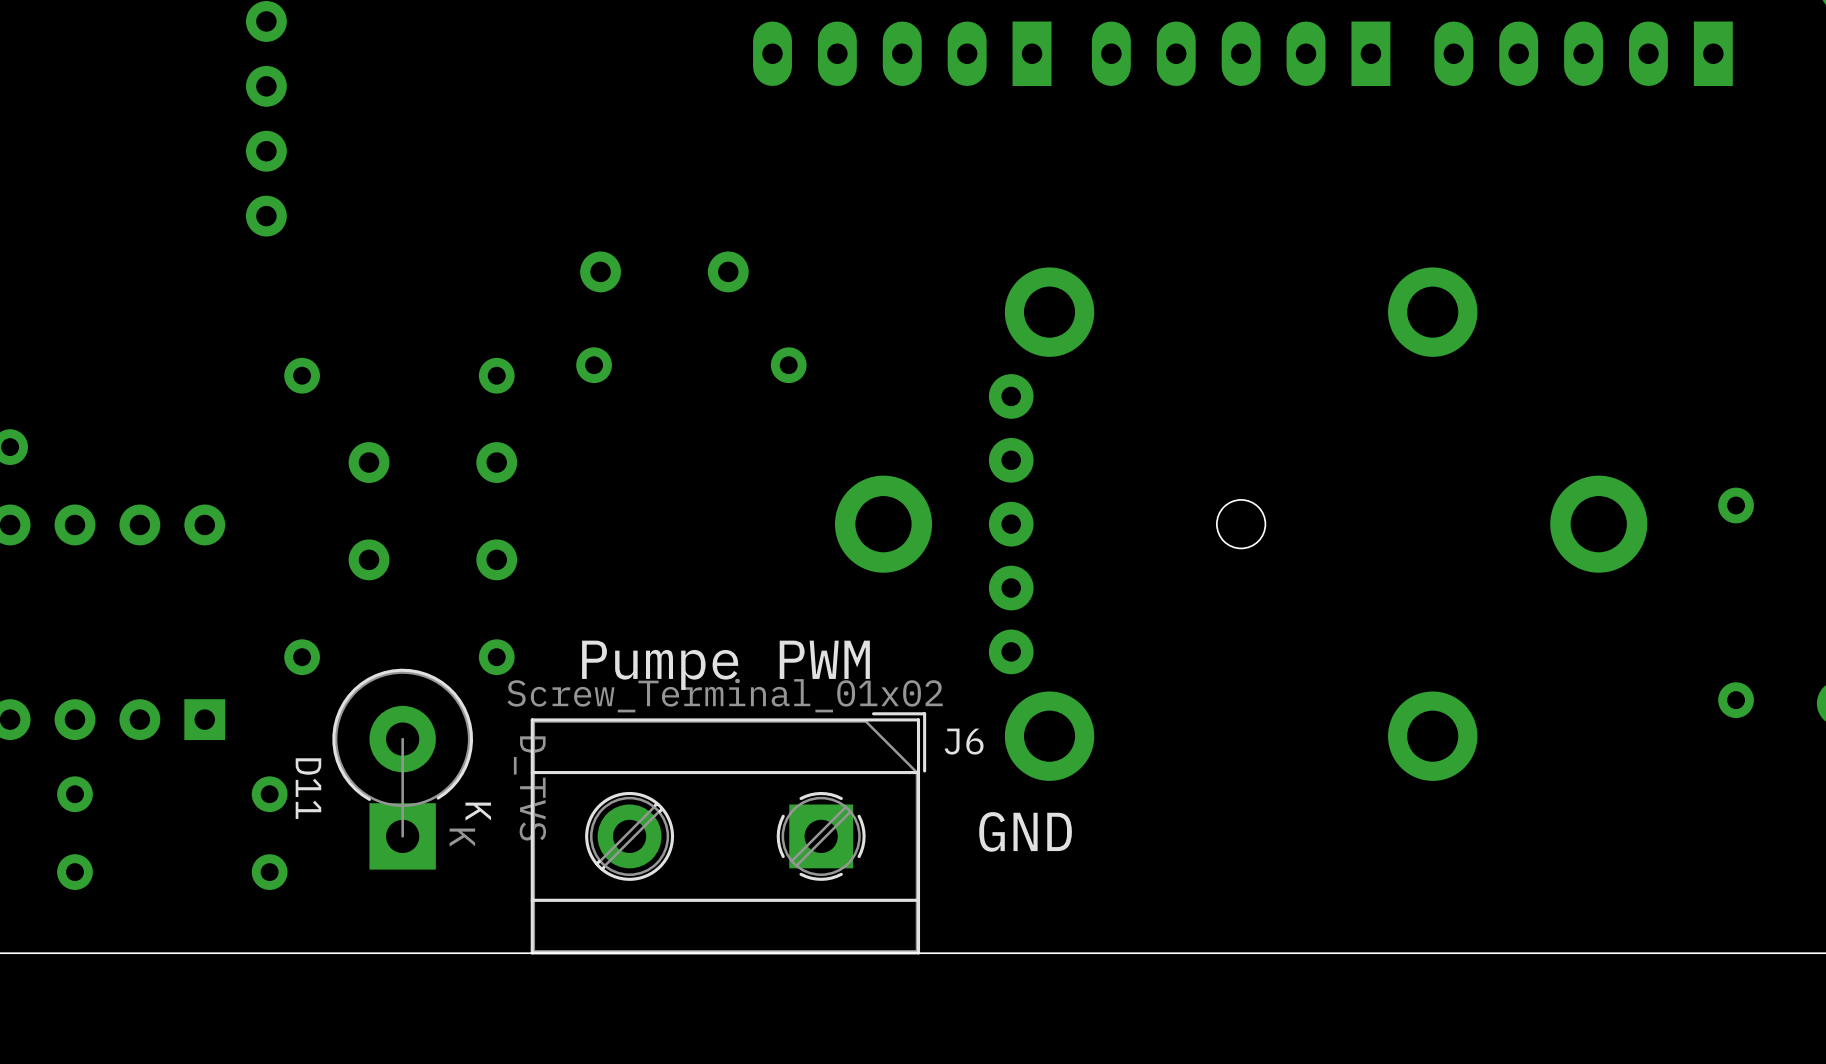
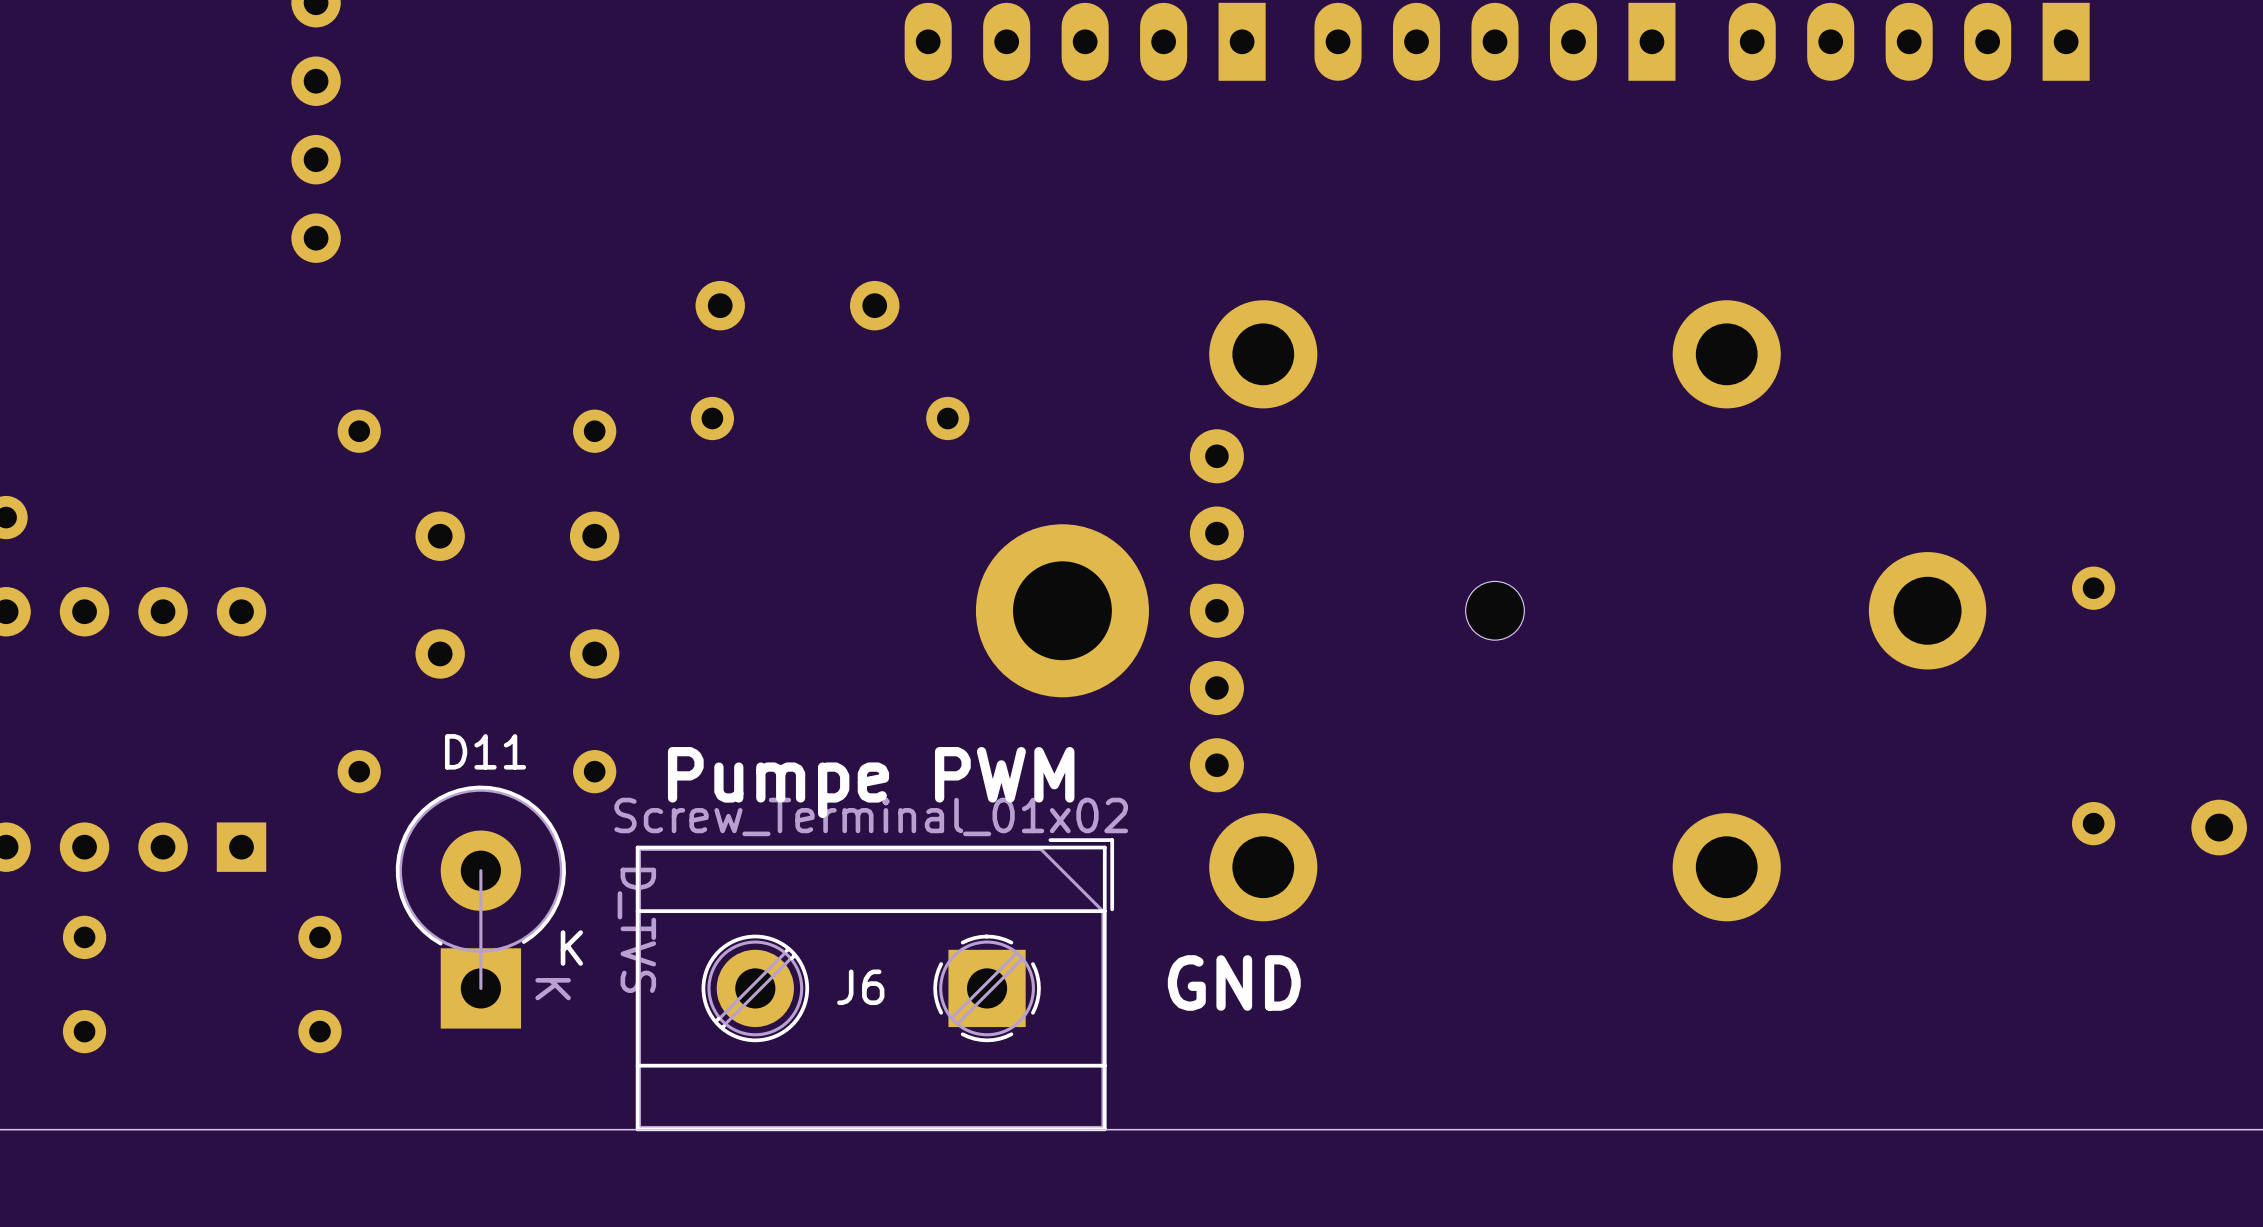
part footprint: [834, 475, 933, 573] -> [975, 524, 1149, 698]
J6 name position: J6 (964, 741) -> J6 (860, 987)
D11 name rotation: 0° (308, 788) -> 90° counterclockwise (485, 751)
D11 name position: D11 (308, 788) -> D11 (485, 751)
D11 text rotation: 0° (478, 811) -> 90° counterclockwise (571, 948)

